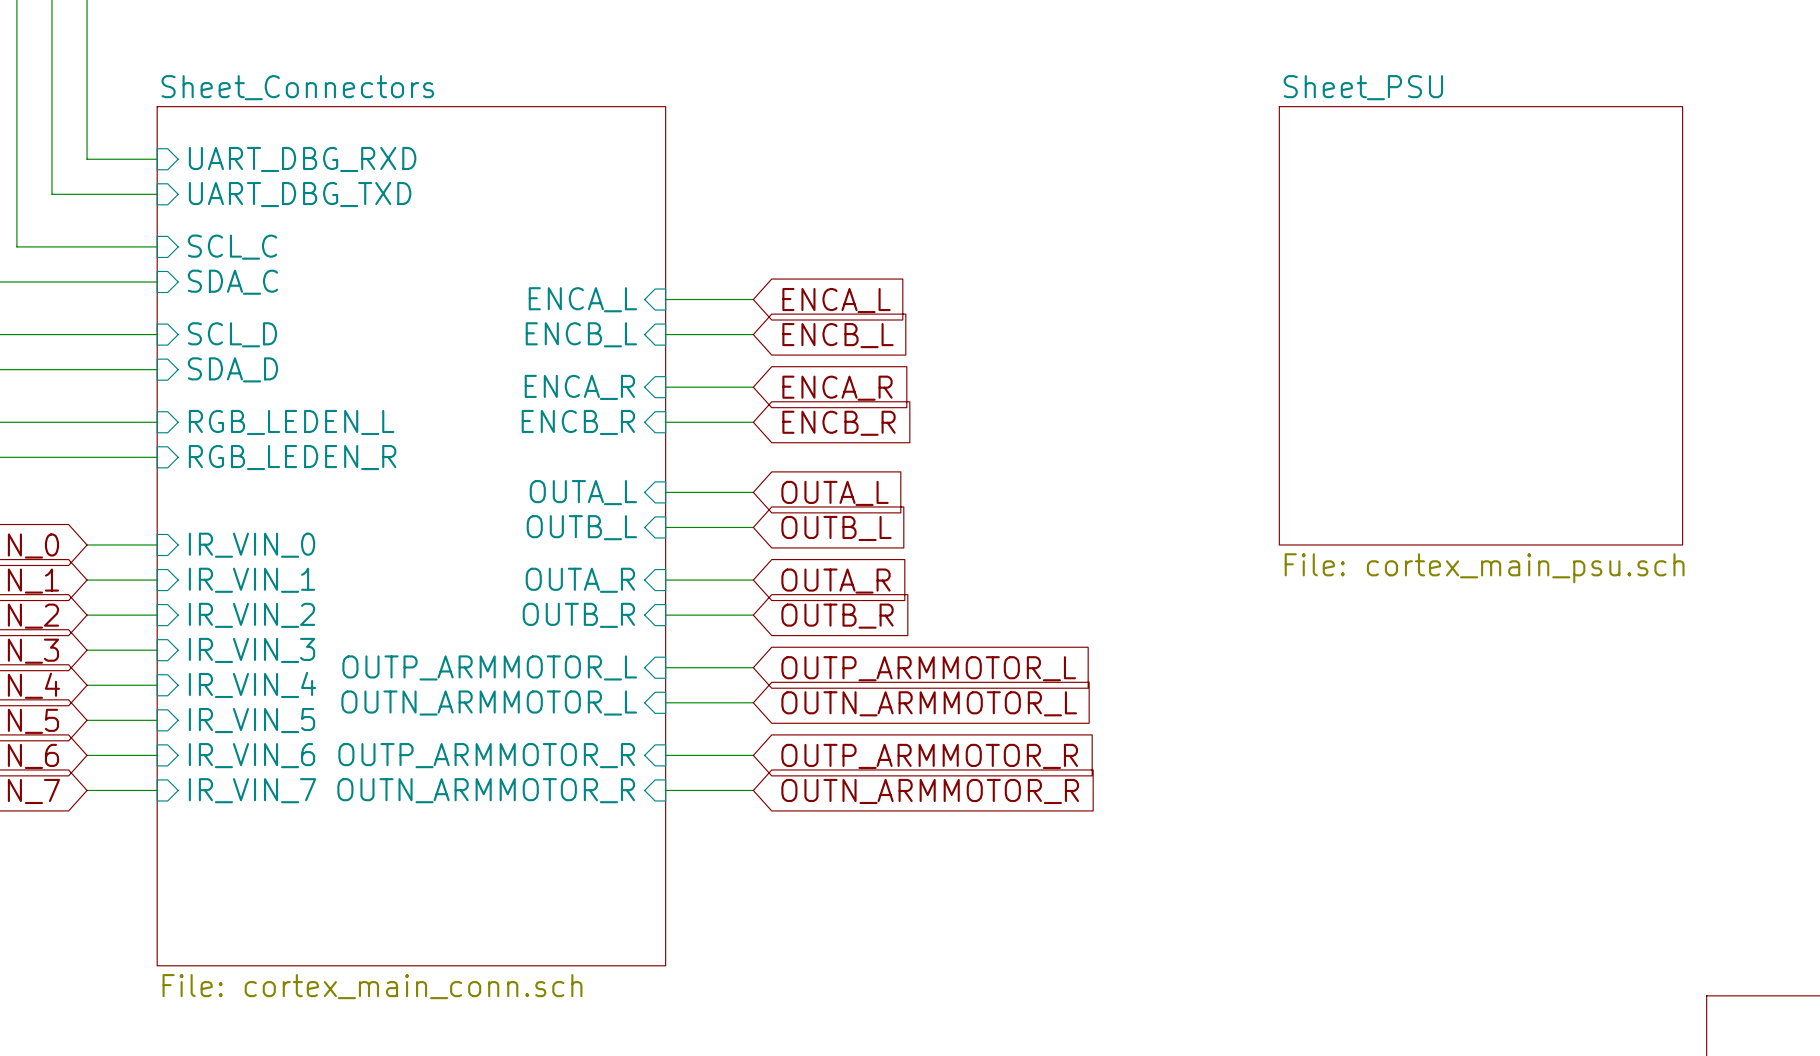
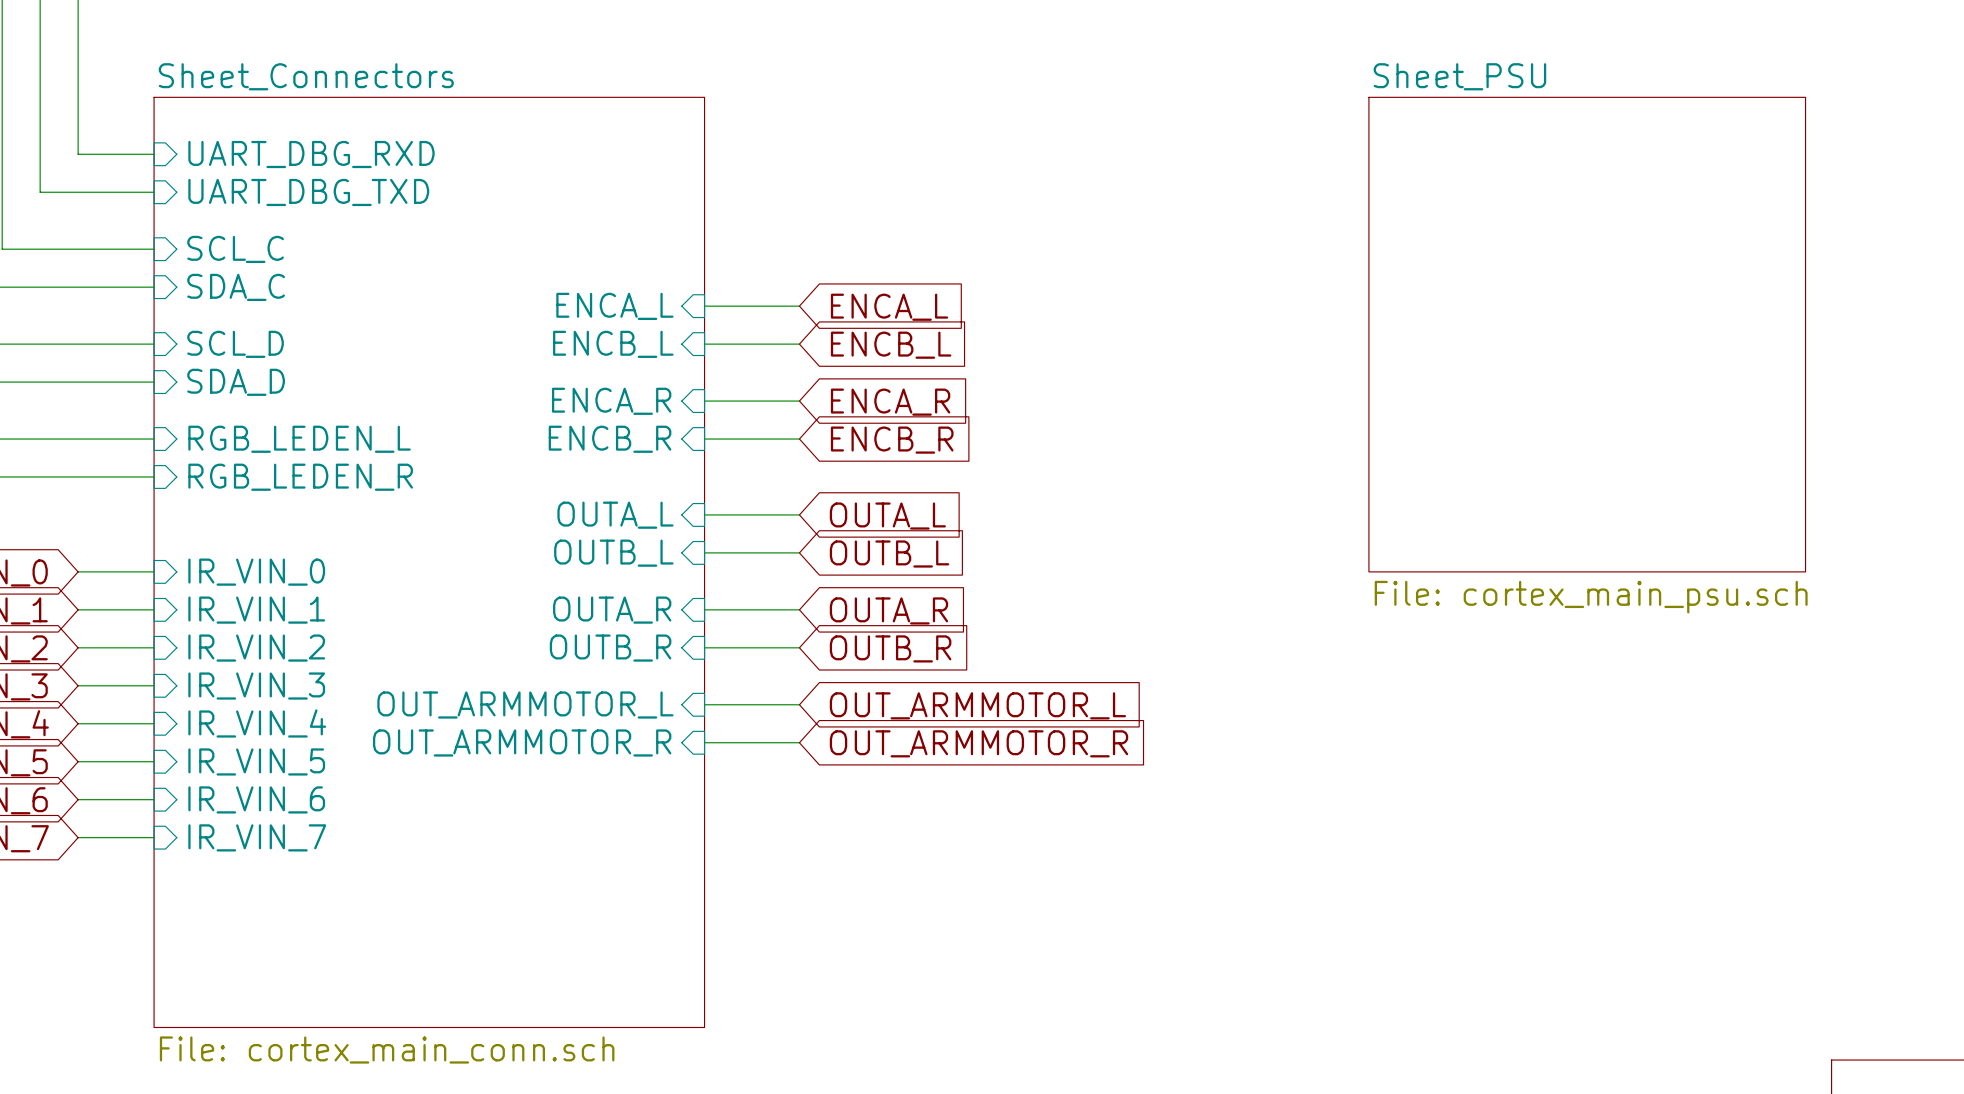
sheet pin: OUTP_ARMMOTOR_L (489, 667) -> OUT_ARMMOTOR_L (525, 705)
global label: OUTP_ARMMOTOR_L (928, 668) -> OUT_ARMMOTOR_L (977, 705)
sheet pin: OUTN_ARMMOTOR_L (489, 703) -> OUT_ARMMOTOR_R (522, 742)
global label: OUTN_ARMMOTOR_L (929, 703) -> OUT_ARMMOTOR_R (978, 743)
sheet pin: OUTP_ARMMOTOR_R (486, 755) -> none
wire: (665, 755) (753, 755) -> none
global label: OUTP_ARMMOTOR_R (929, 756) -> none
sheet pin: OUTN_ARMMOTOR_R (486, 790) -> none
wire: (665, 790) (753, 790) -> none
global label: OUTN_ARMMOTOR_R (930, 791) -> none

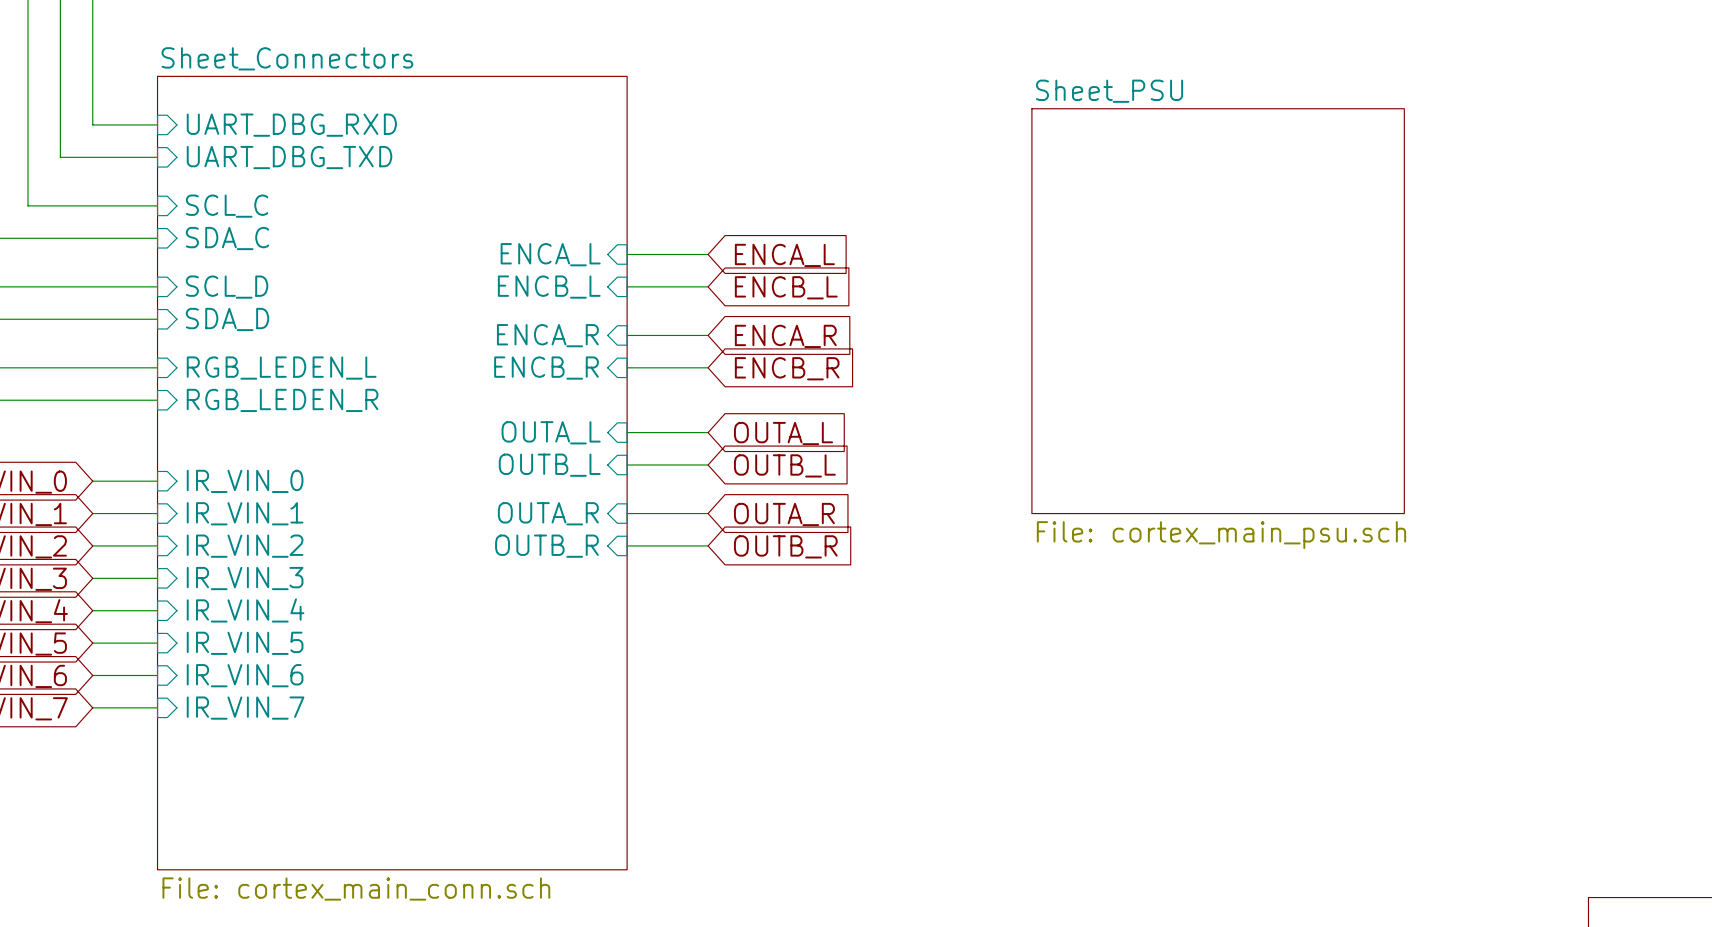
sheet Sheet_PSU position: (1587, 334) -> (1218, 311)
wire: (704, 704) (799, 704) -> none
sheet pin: OUT_ARMMOTOR_L (525, 705) -> none
global label: OUT_ARMMOTOR_L (977, 705) -> none
sheet pin: OUT_ARMMOTOR_R (522, 742) -> none
wire: (704, 742) (799, 742) -> none
global label: OUT_ARMMOTOR_R (978, 743) -> none

